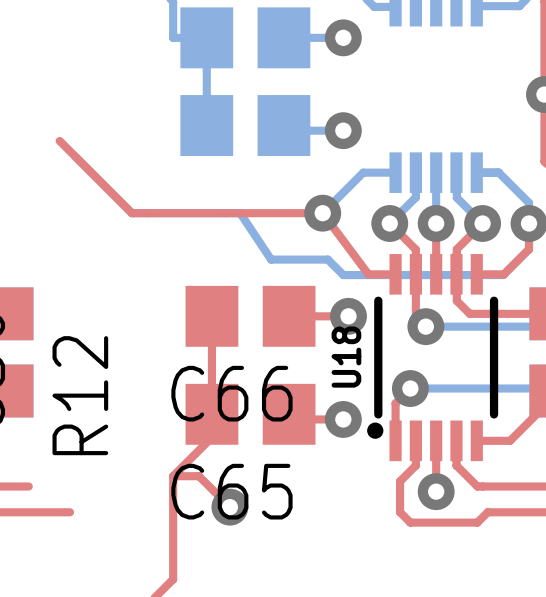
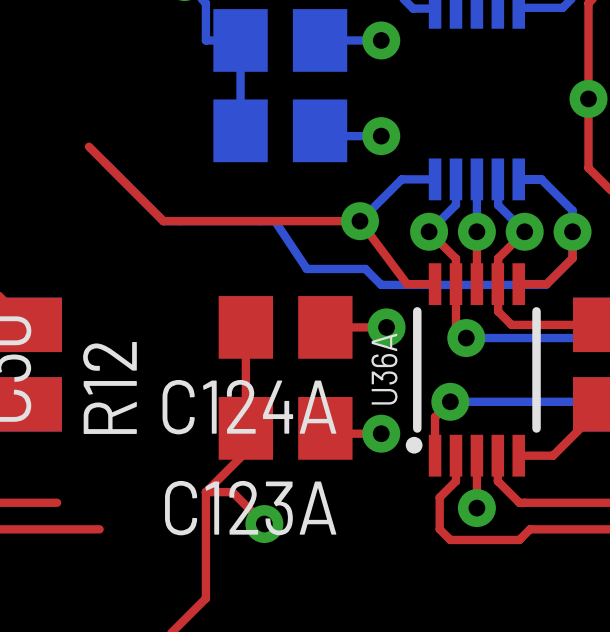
U18 name: U18 (346, 357) -> U36A (384, 369)
C66 name: C66 (231, 393) -> C124A (249, 407)
C65 name: C65 (231, 491) -> C123A (250, 508)

